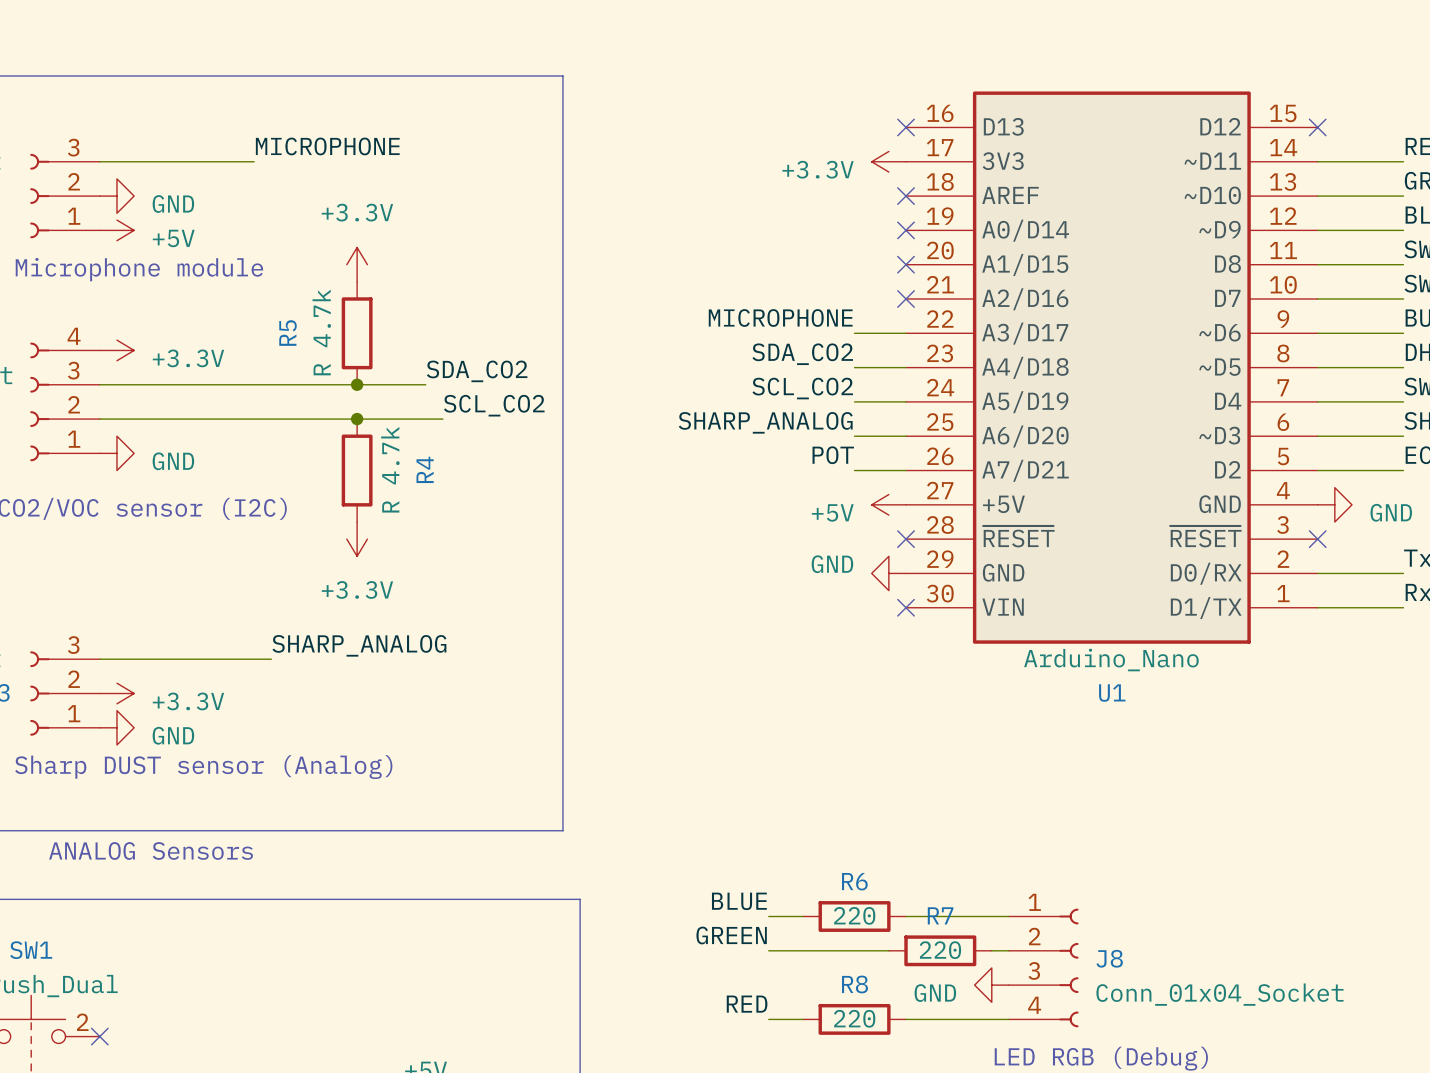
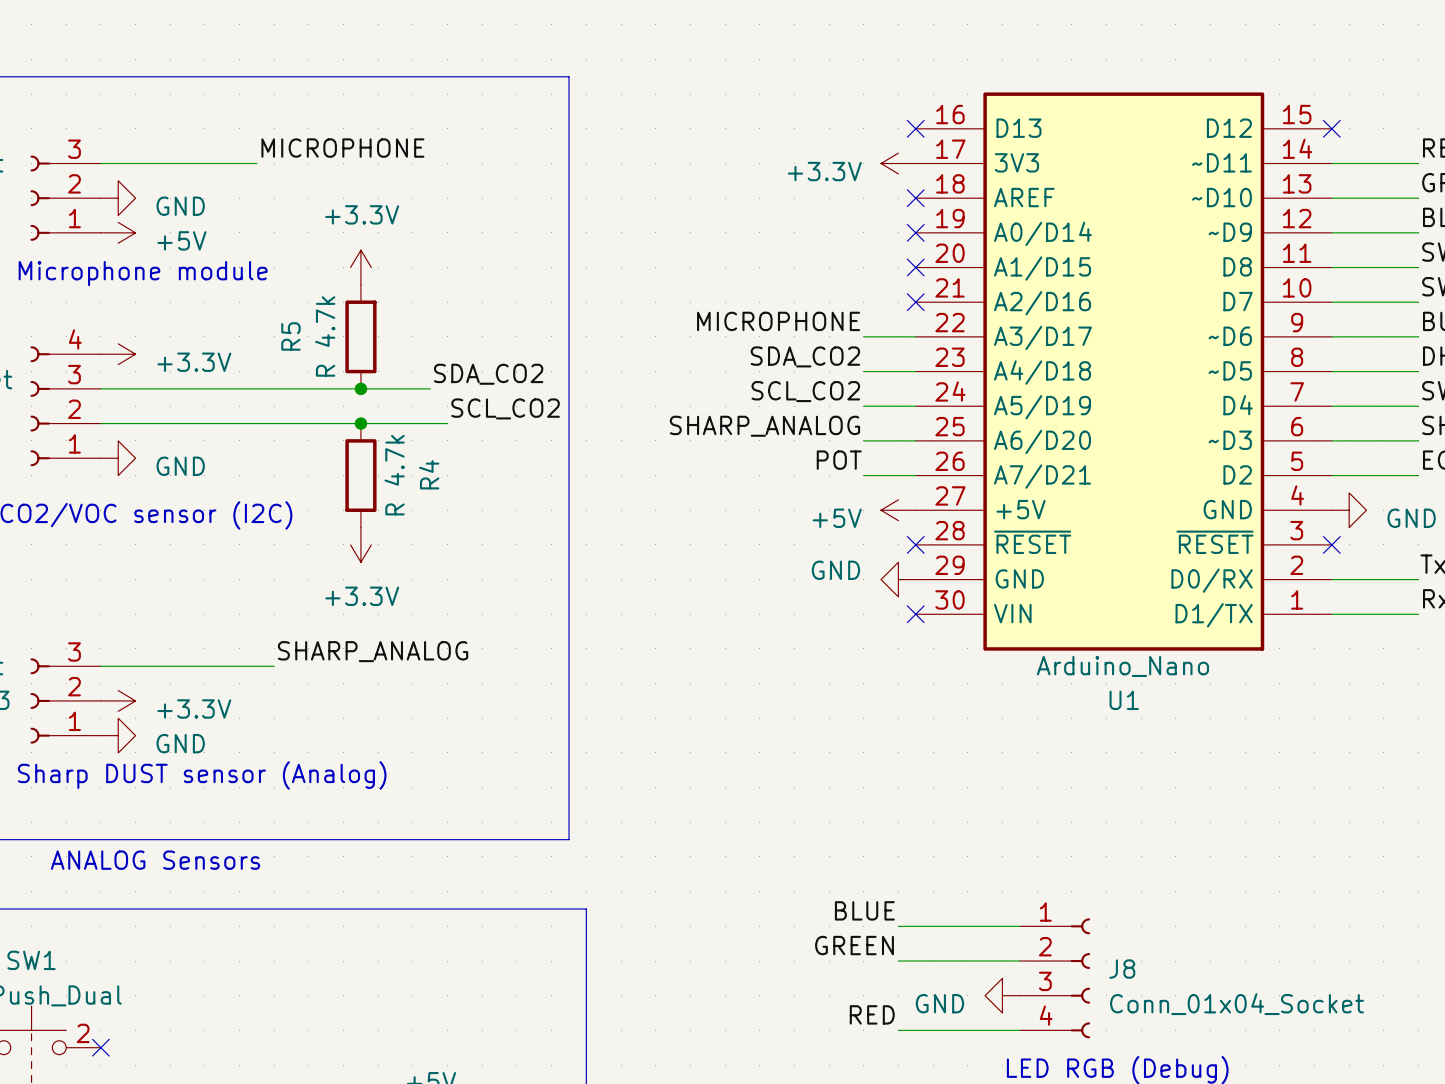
label position: BLUE (739, 901) -> BLUE (864, 910)
wire: (768, 916) (803, 916) -> none
R6: 220 (854, 916) -> none
label position: GREEN (731, 935) -> GREEN (854, 945)
wire: (768, 950) (888, 950) -> (1002, 961) (898, 961)
R7: 220 (940, 950) -> none
label position: RED (747, 1004) -> RED (872, 1014)
wire: (768, 1019) (803, 1019) -> none
R8: 220 (854, 1019) -> none

